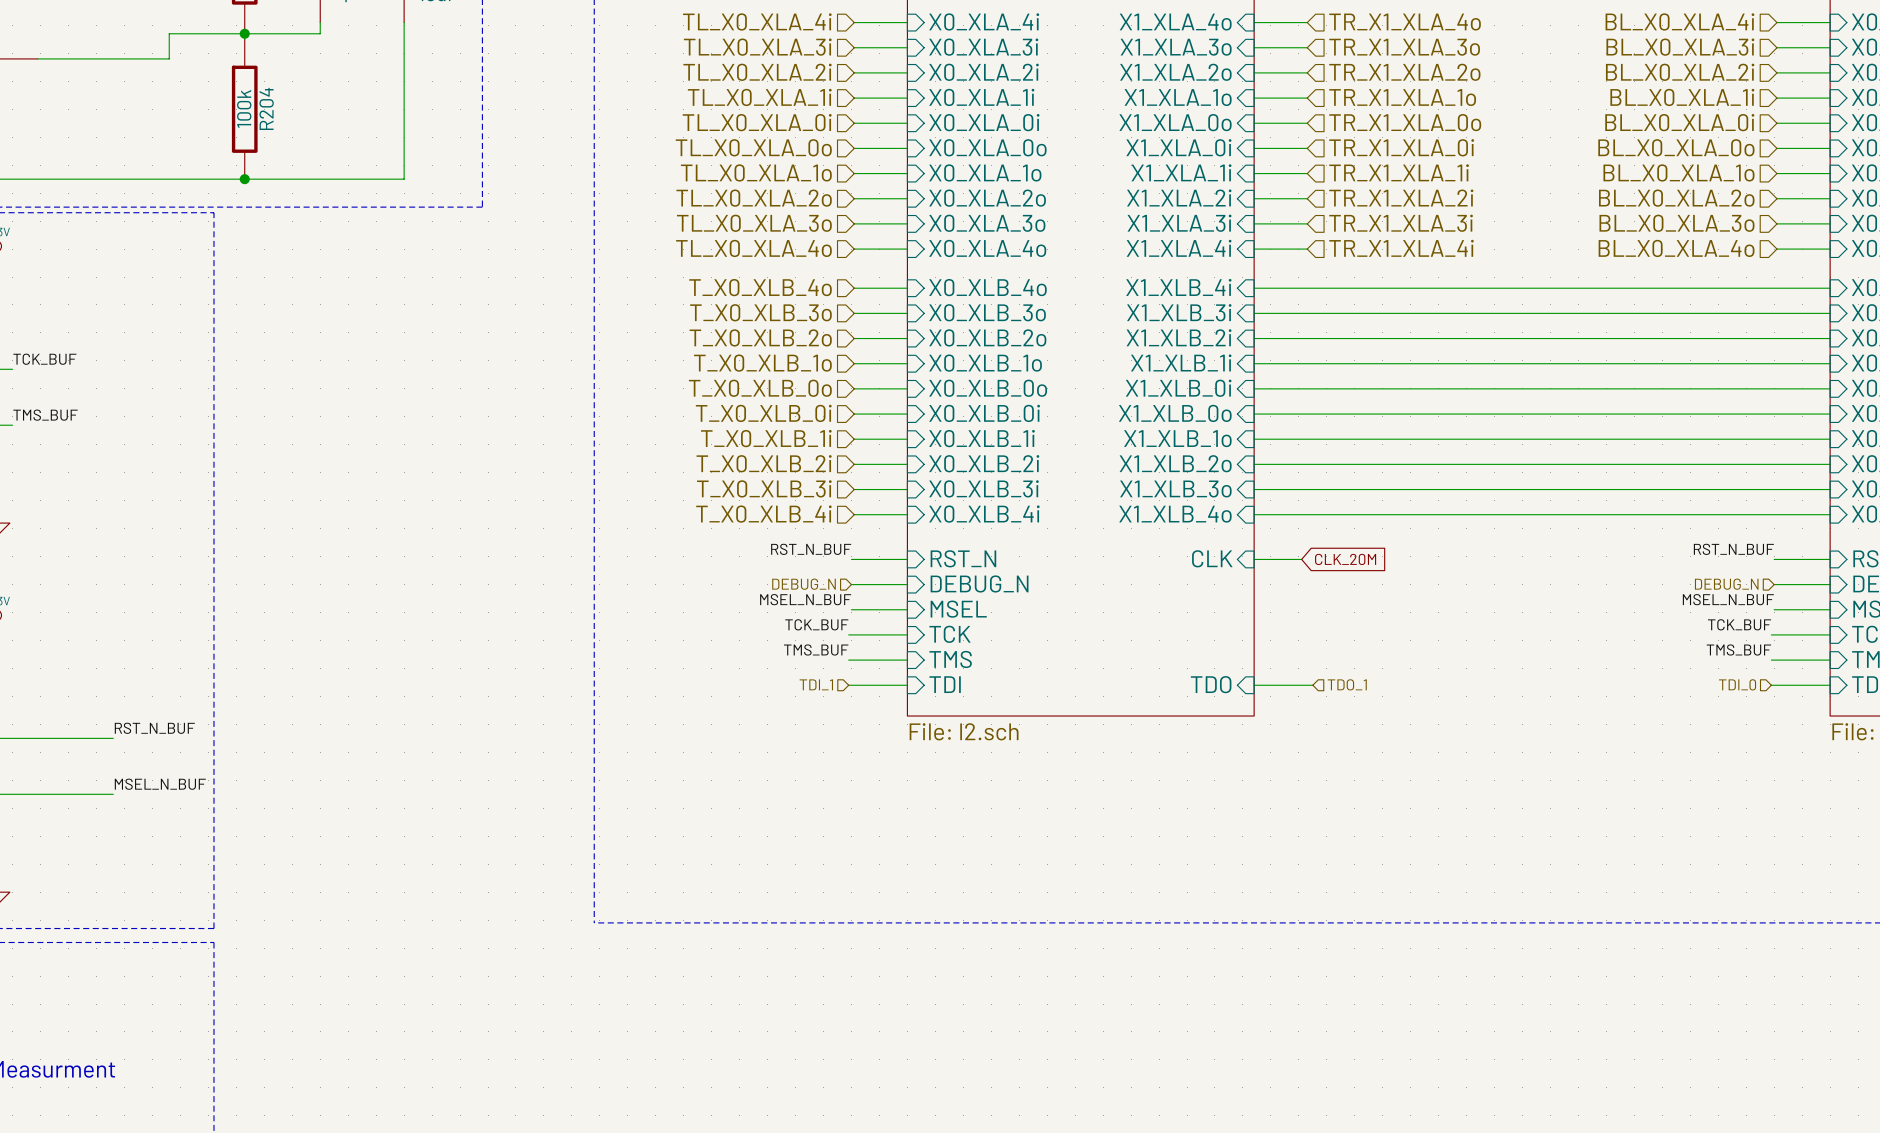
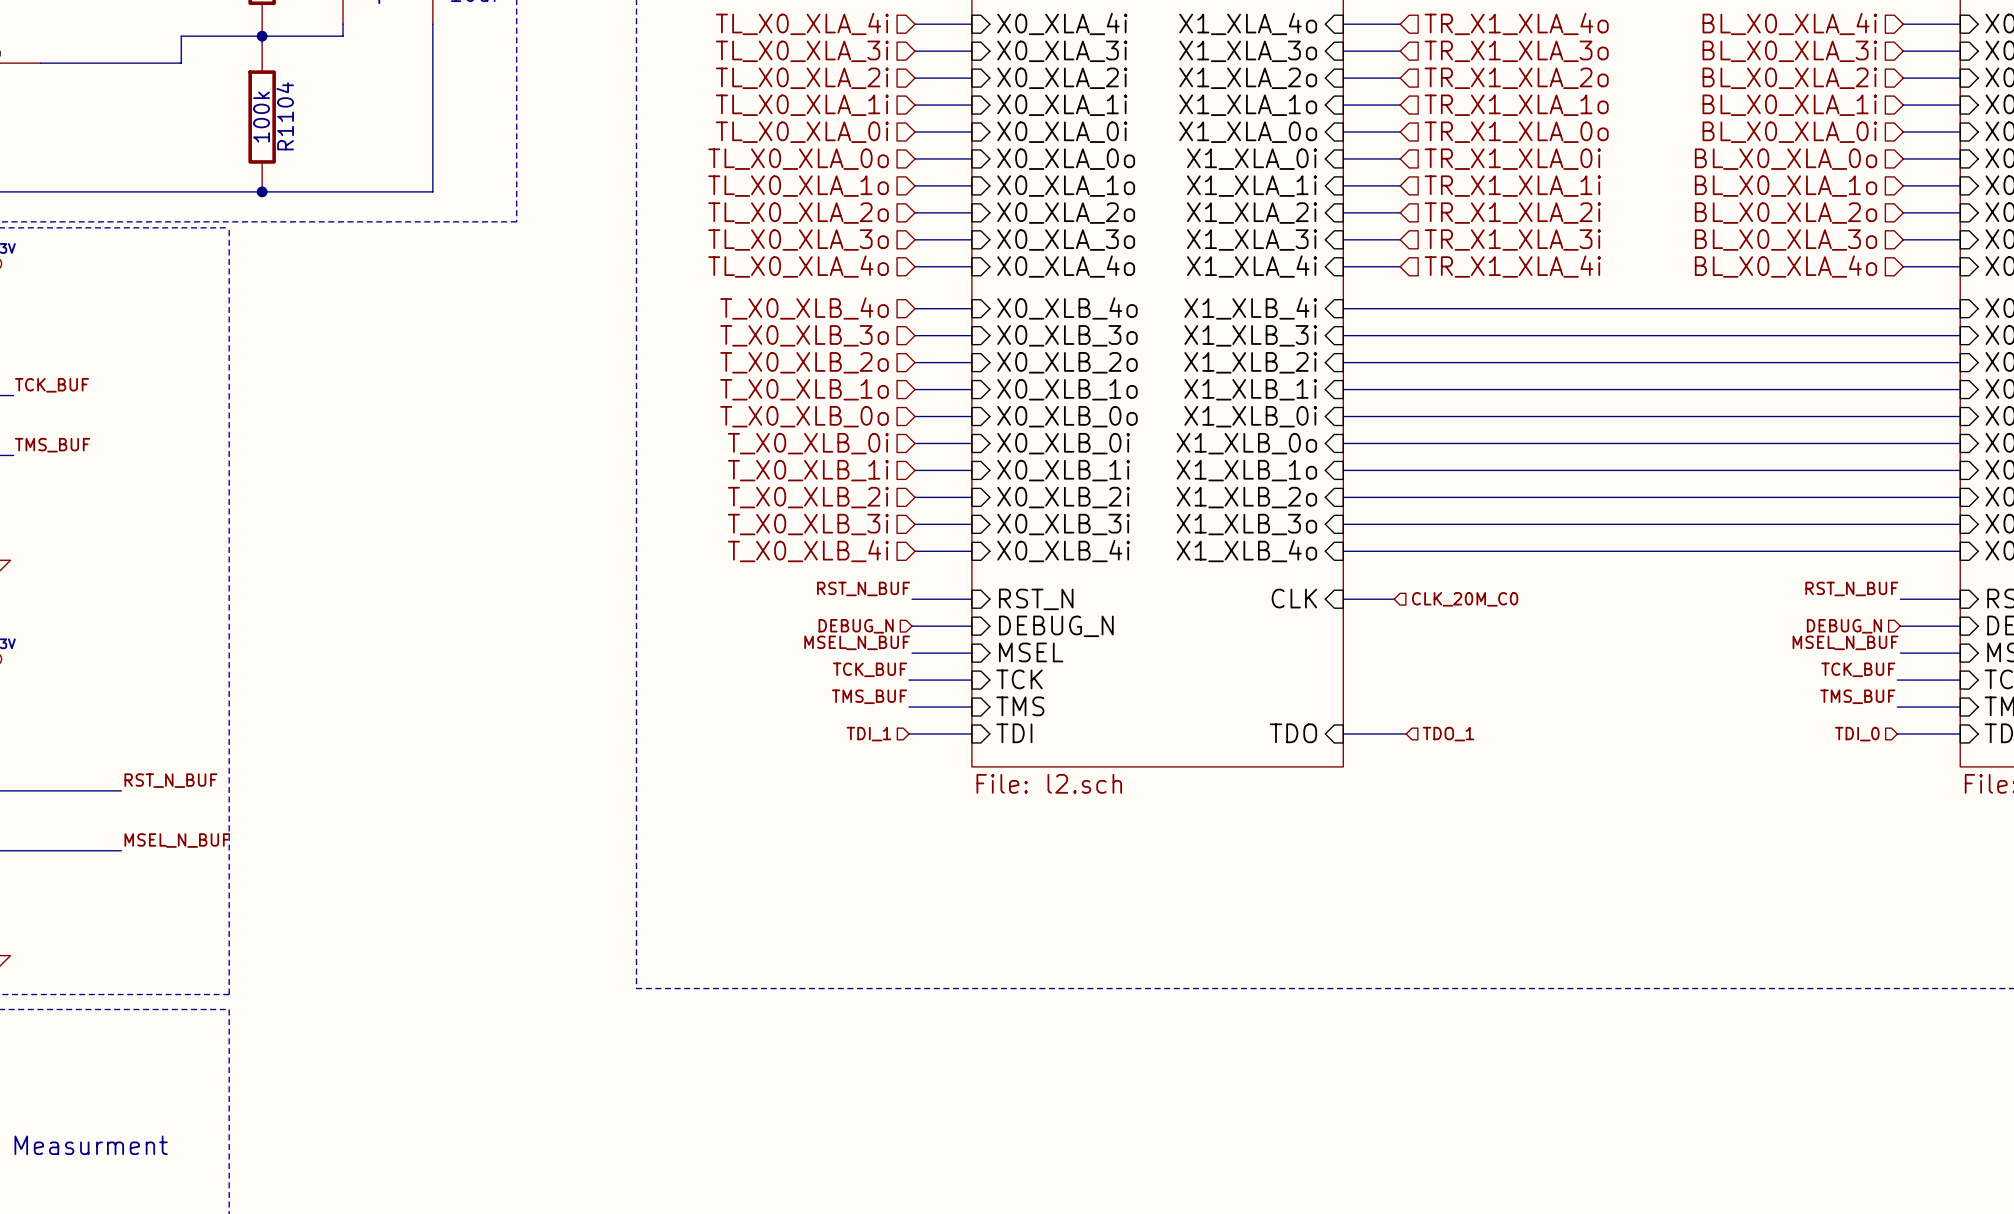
R204 name: R204 (266, 108) -> R1104 (285, 116)
global label: CLK_20M (1345, 559) -> none
hierarchical label: none -> CLK_20M_C0 (1465, 599)

